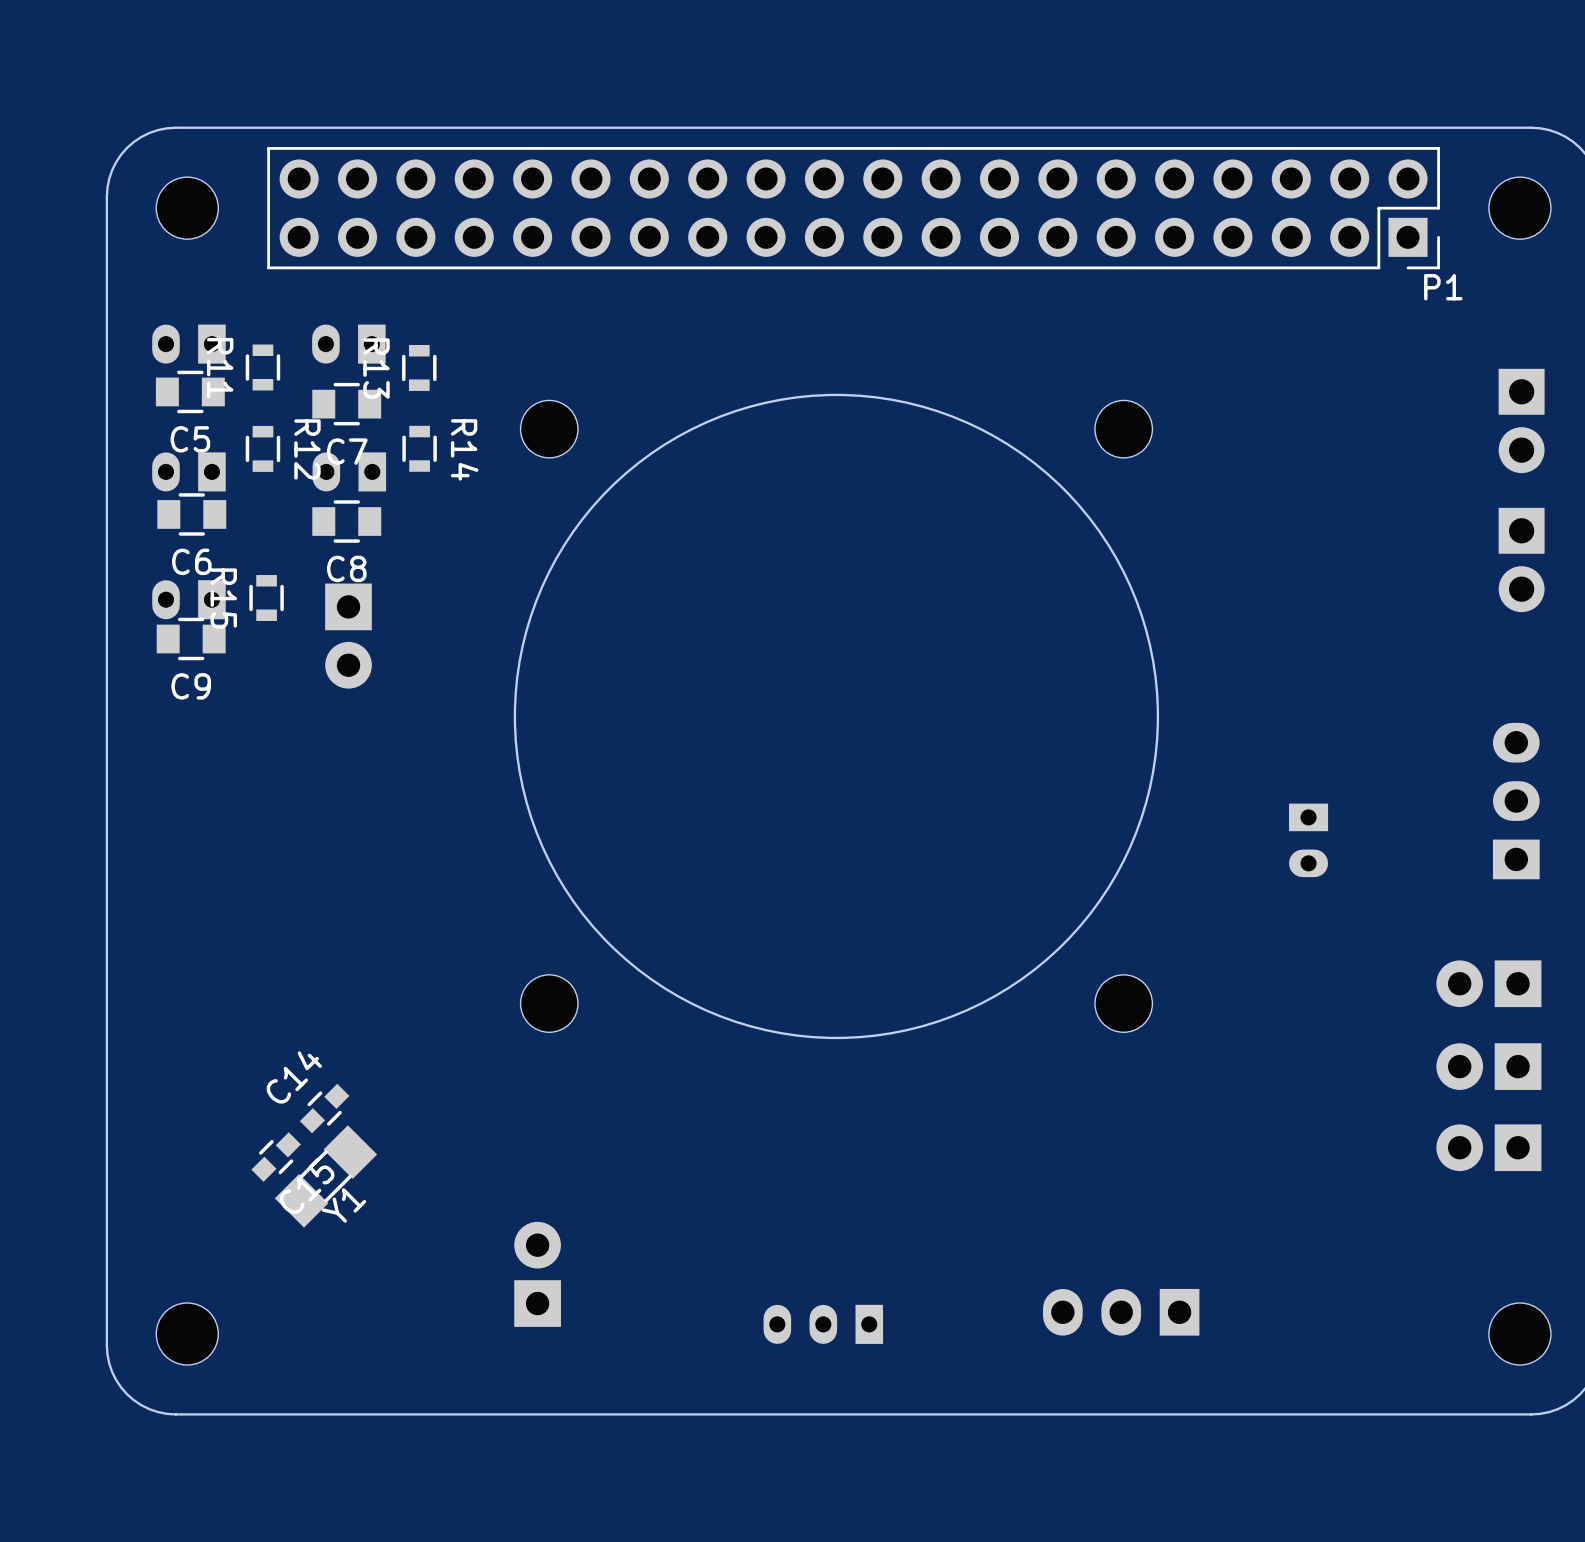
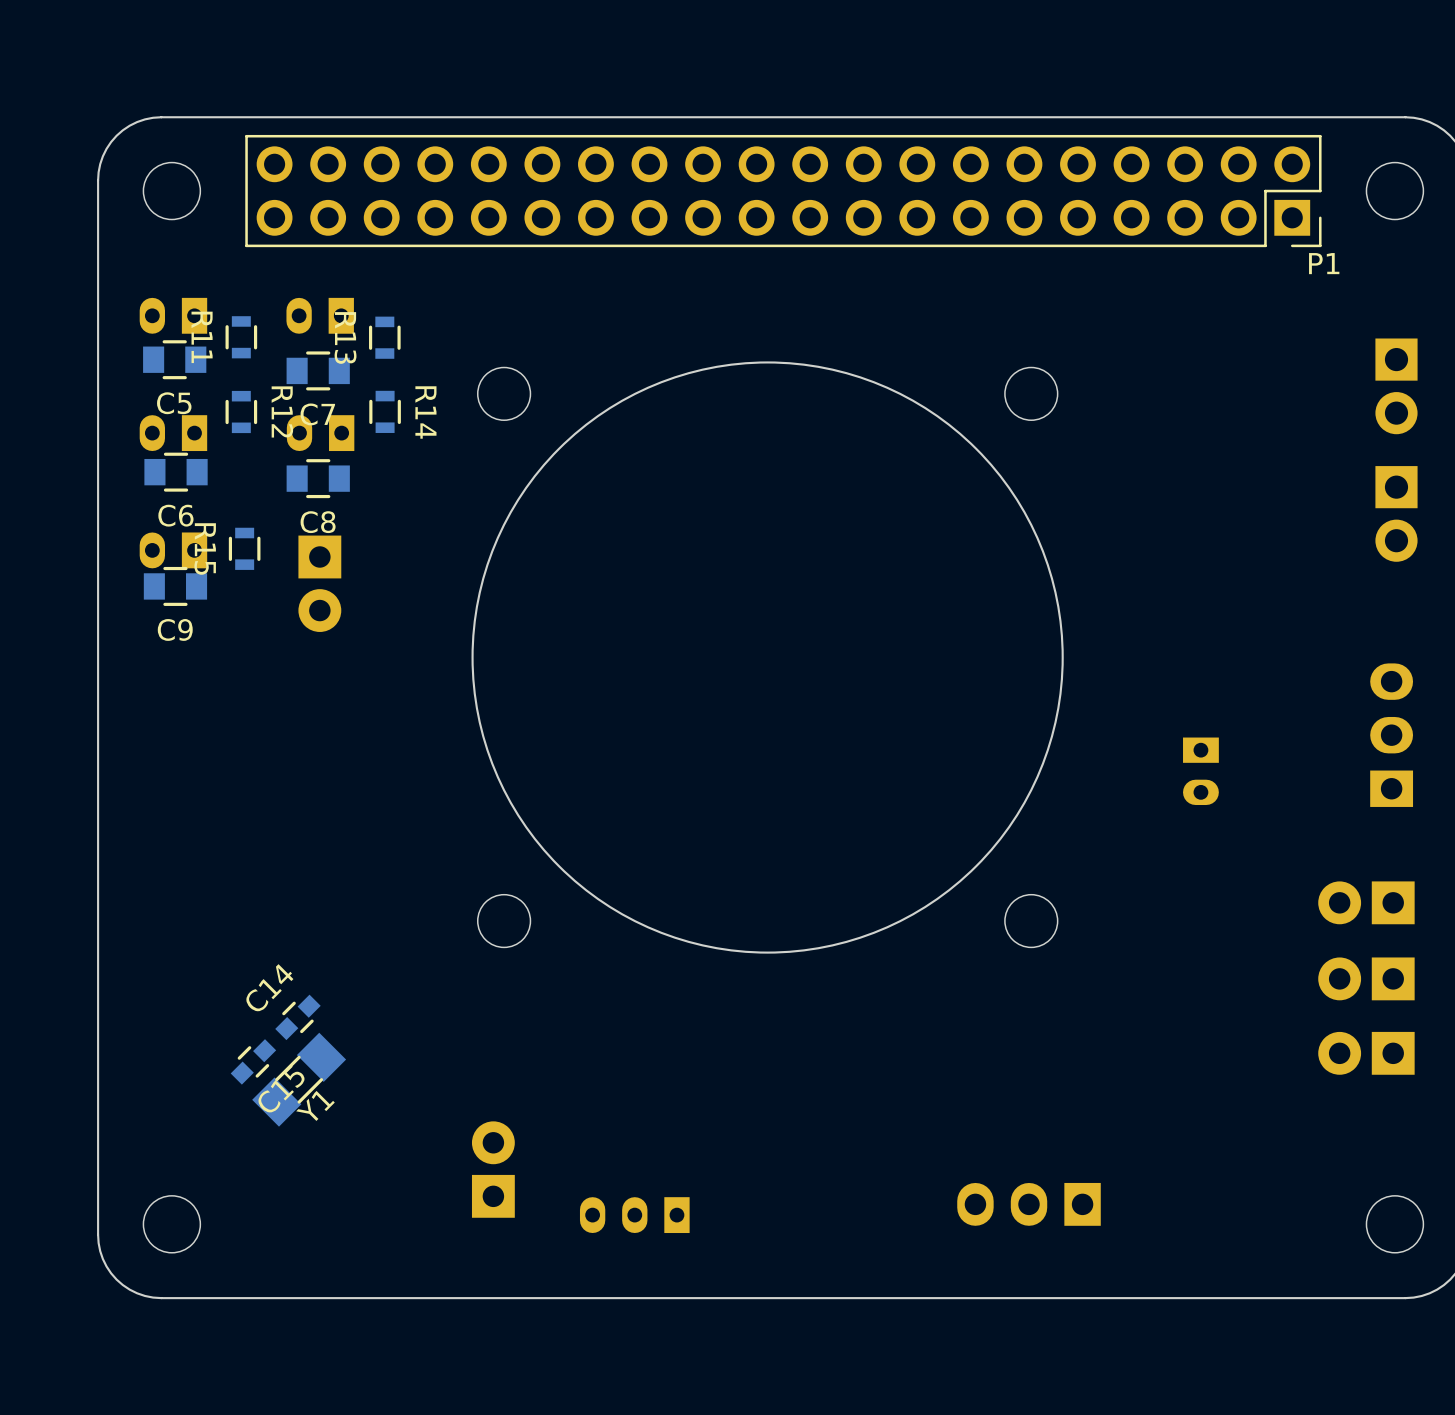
part position: (823, 1324) -> (634, 1215)

